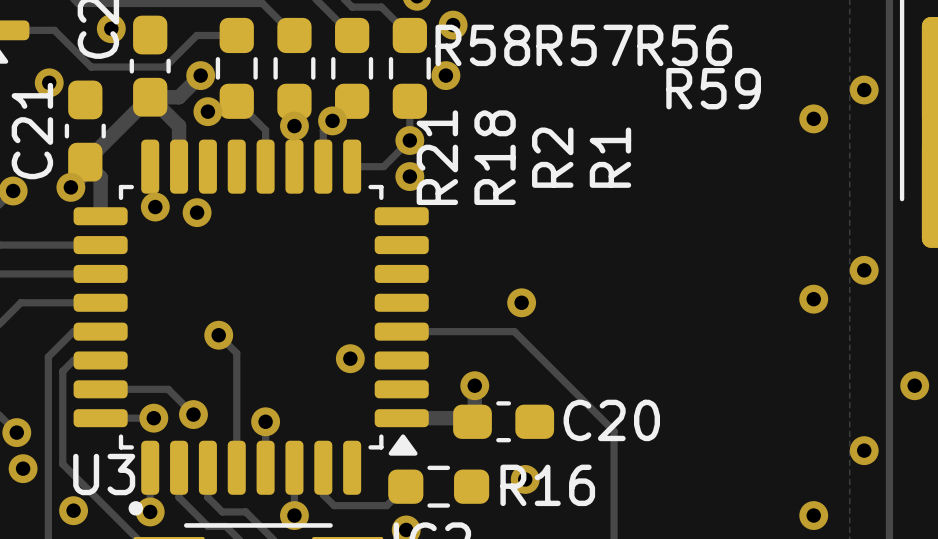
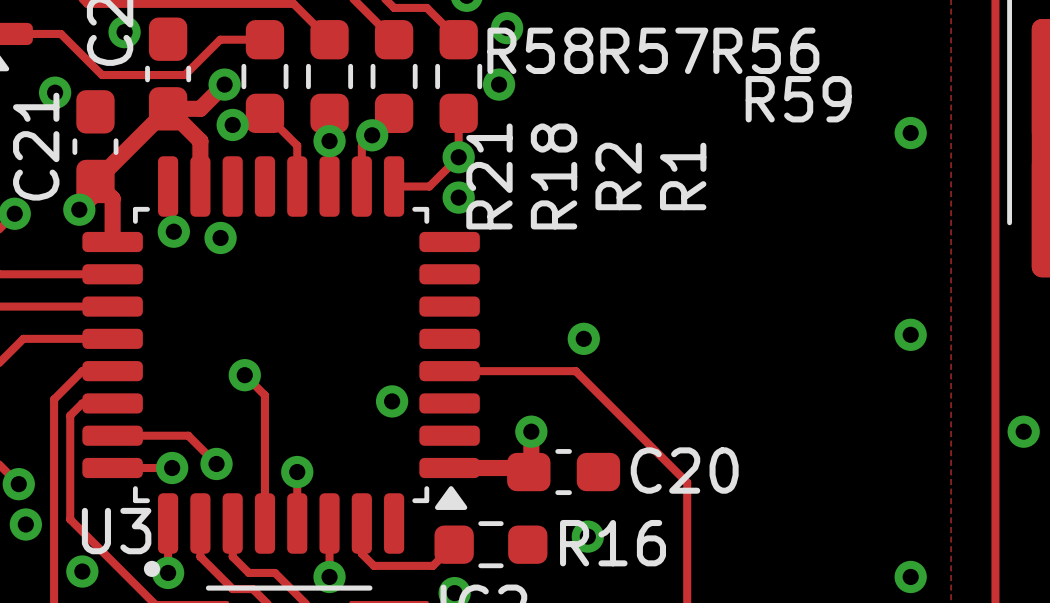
via: (864, 90) -> none
via: (864, 270) -> none
via: (864, 450) -> none

